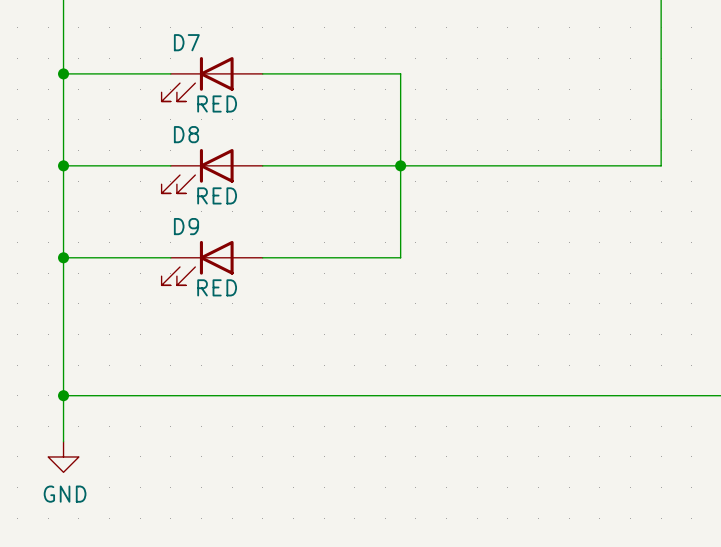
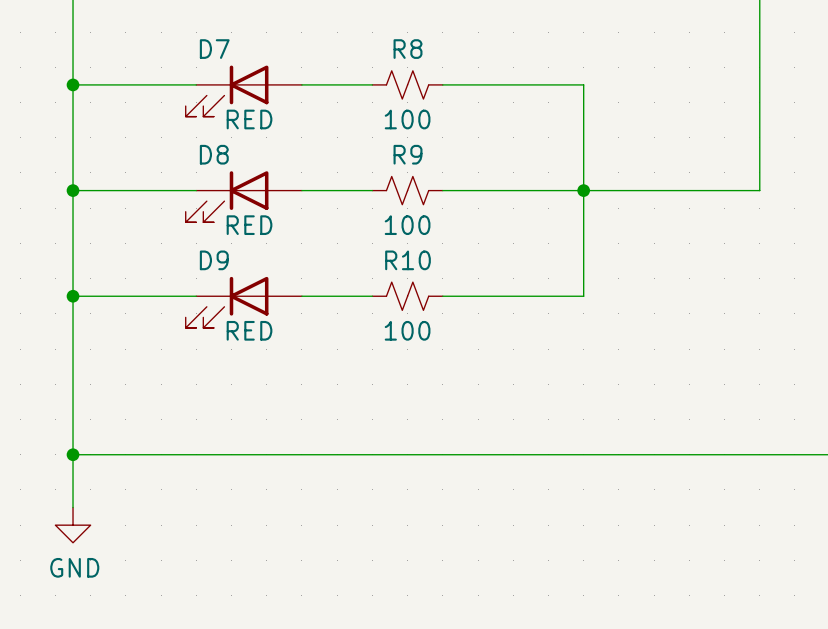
wire: (324, 73) (385, 73) -> none
R8: none -> 100 (407, 84)
wire: (400, 73) (400, 257) -> (460, 84) (583, 84) (583, 296) (460, 296)
wire: (324, 165) (385, 165) -> none
R9: none -> 100 (407, 190)
junction: (400, 165) -> none
junction: none -> (583, 190)
wire: (324, 257) (385, 257) -> none
R10: none -> 100 (407, 296)

